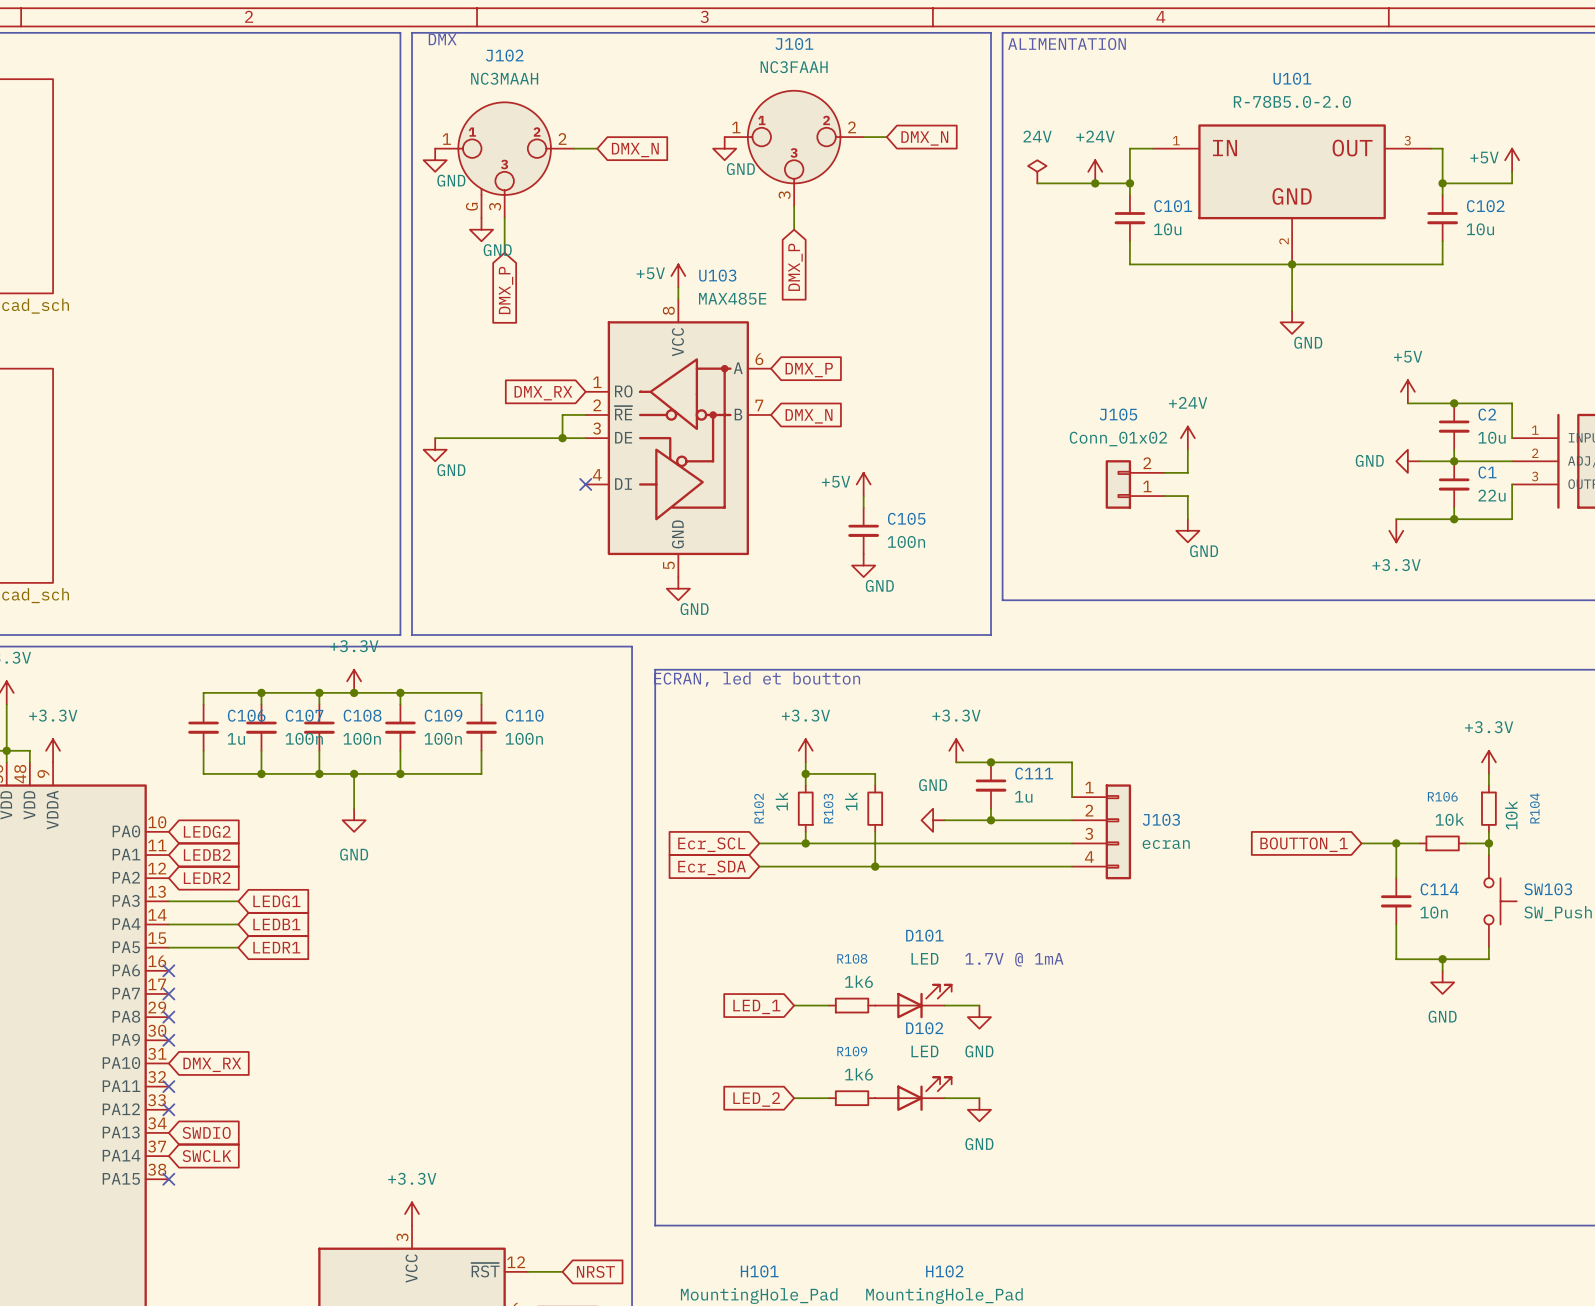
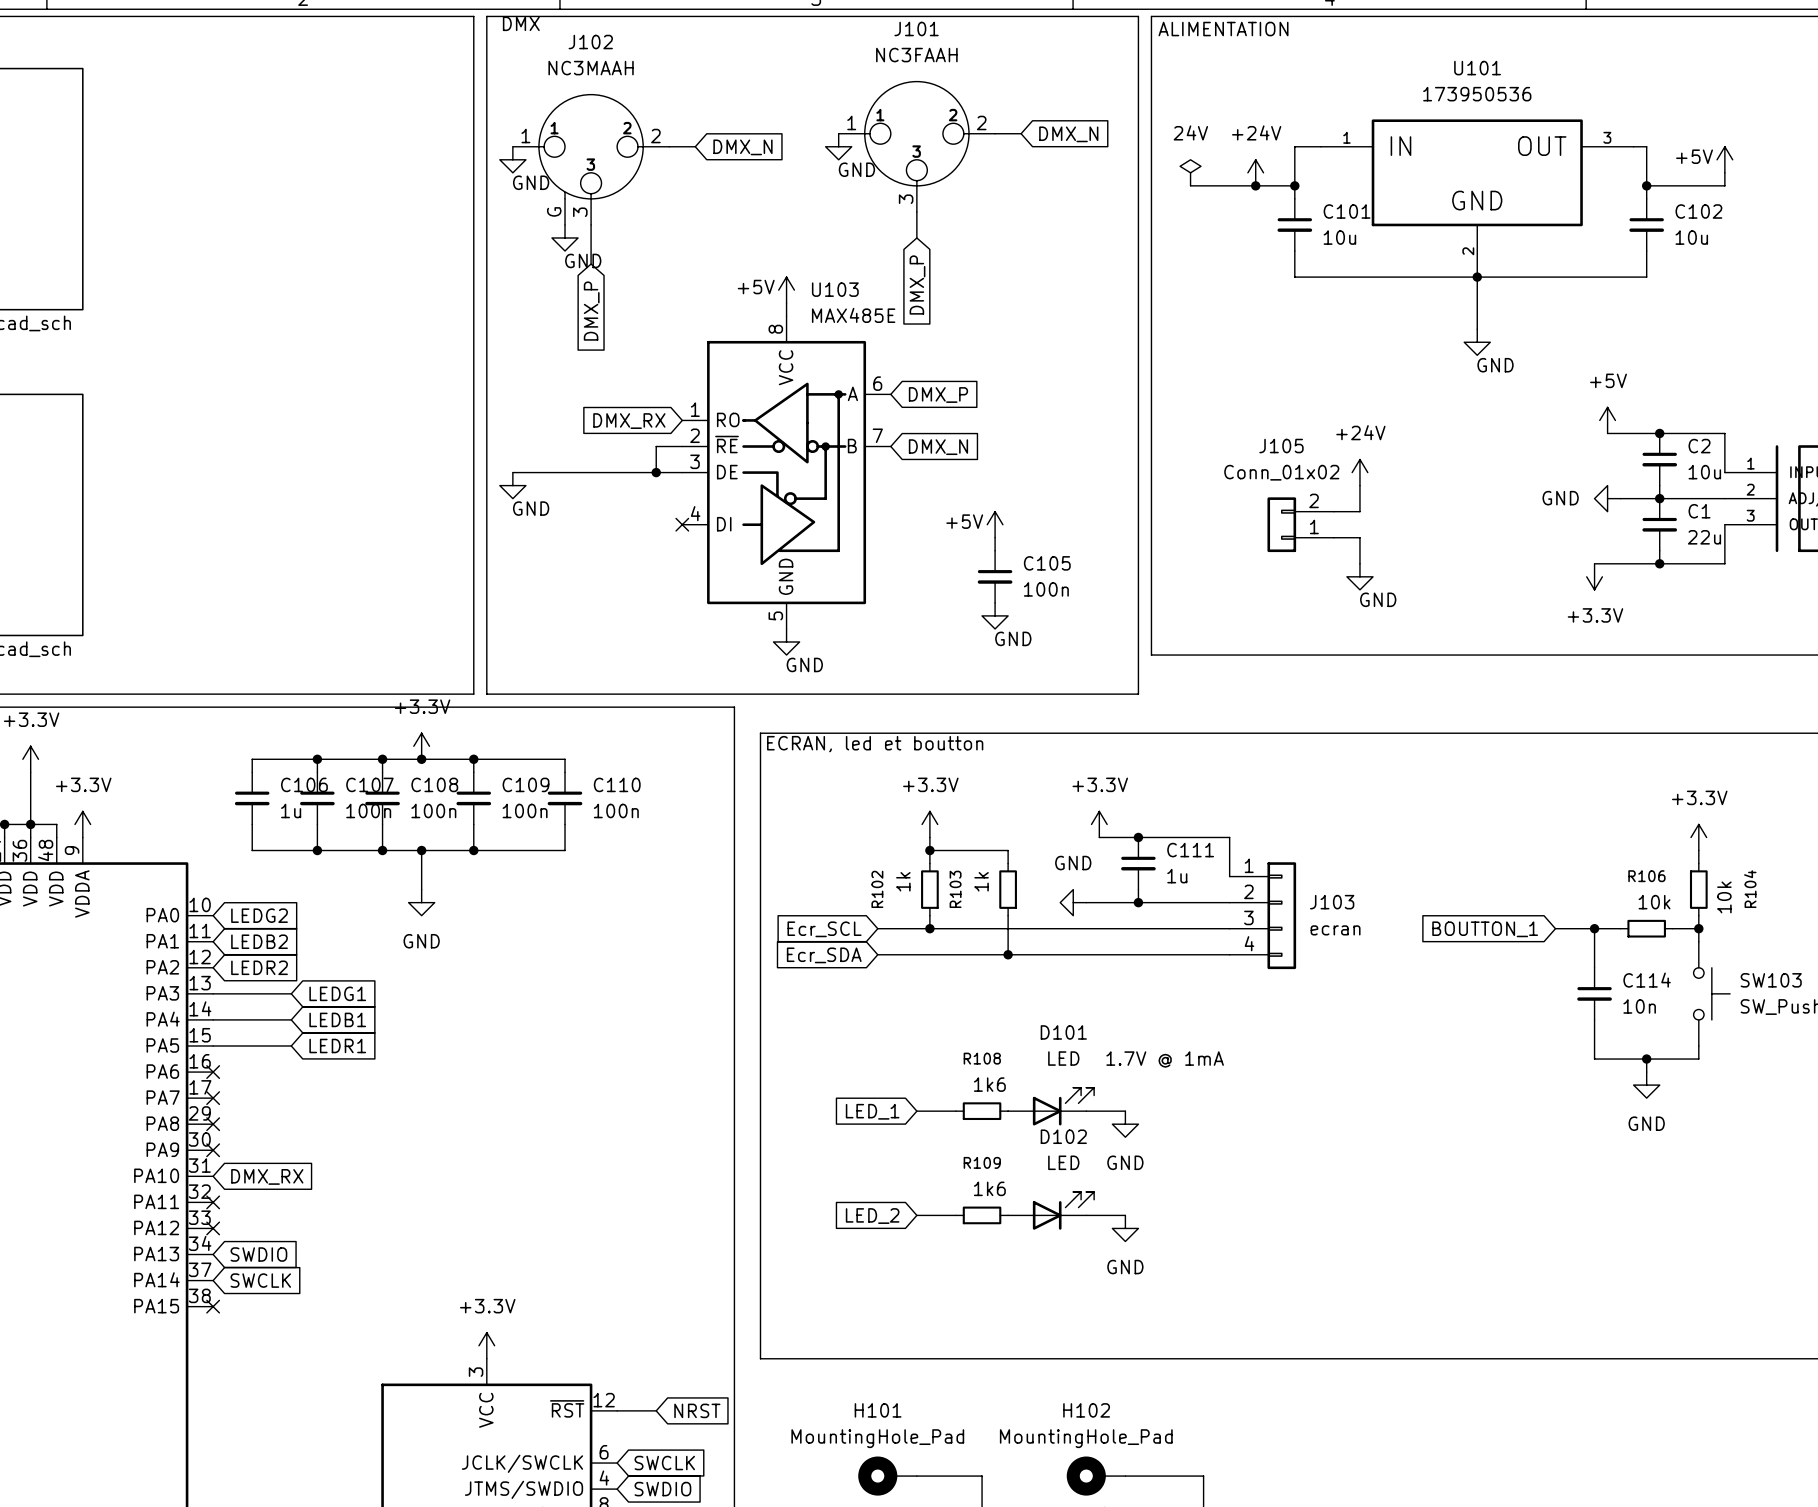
U101 value: R-78B5.0-2.0 (1292, 101) -> 173950536 (1477, 94)

